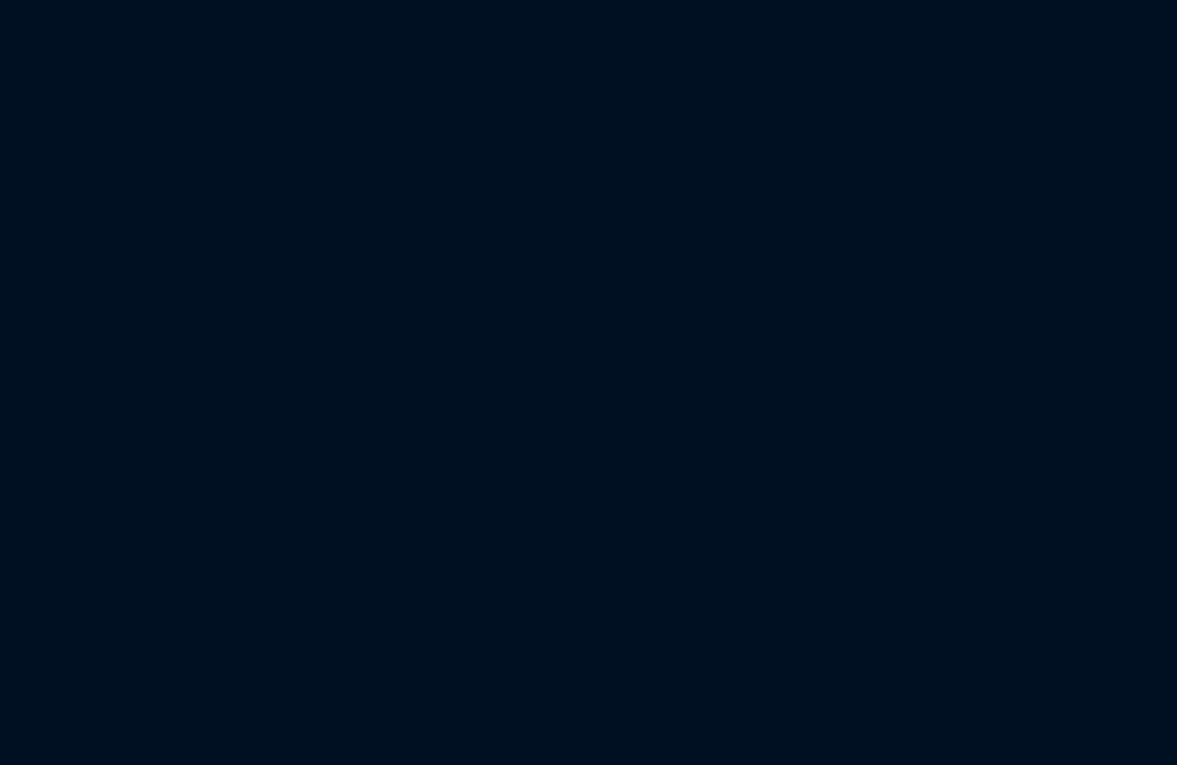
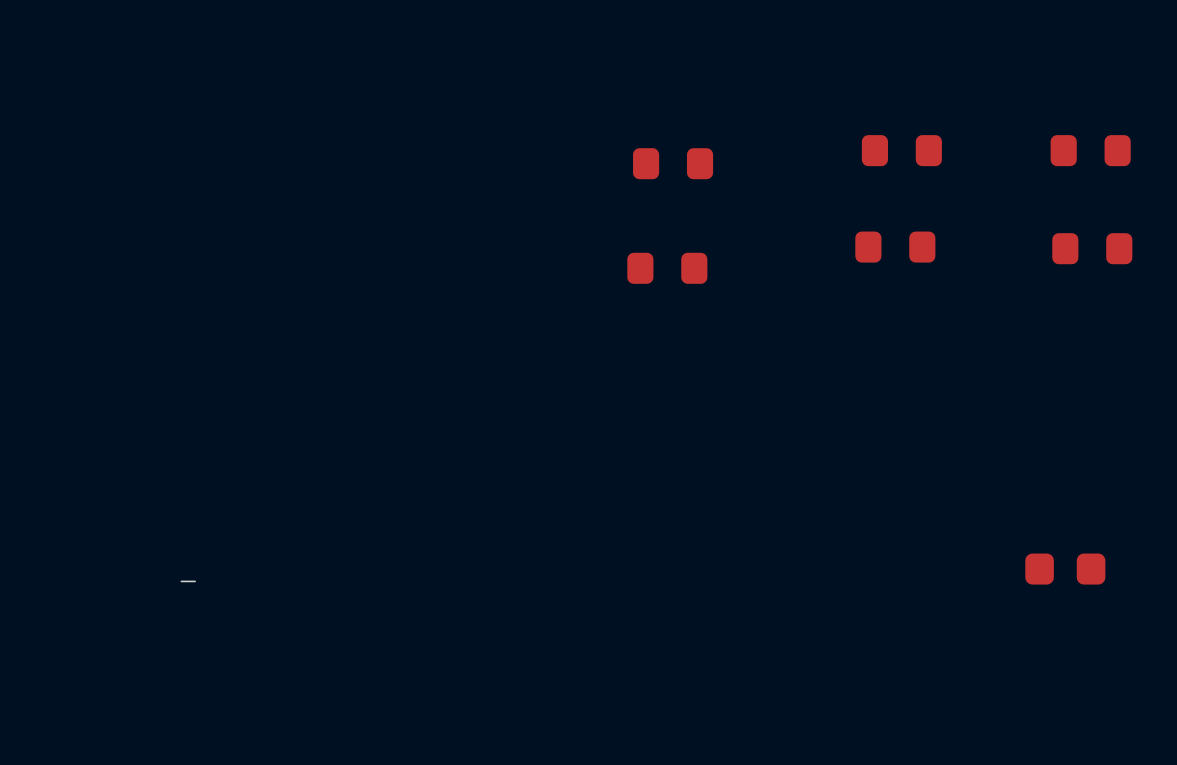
part: none -> (901, 150)
part: none -> (1090, 150)
part: none -> (673, 163)
part: none -> (895, 247)
part: none -> (1092, 248)
part: none -> (667, 268)
part: none -> (1065, 569)
board edge: none -> (195, 581) (181, 581)

